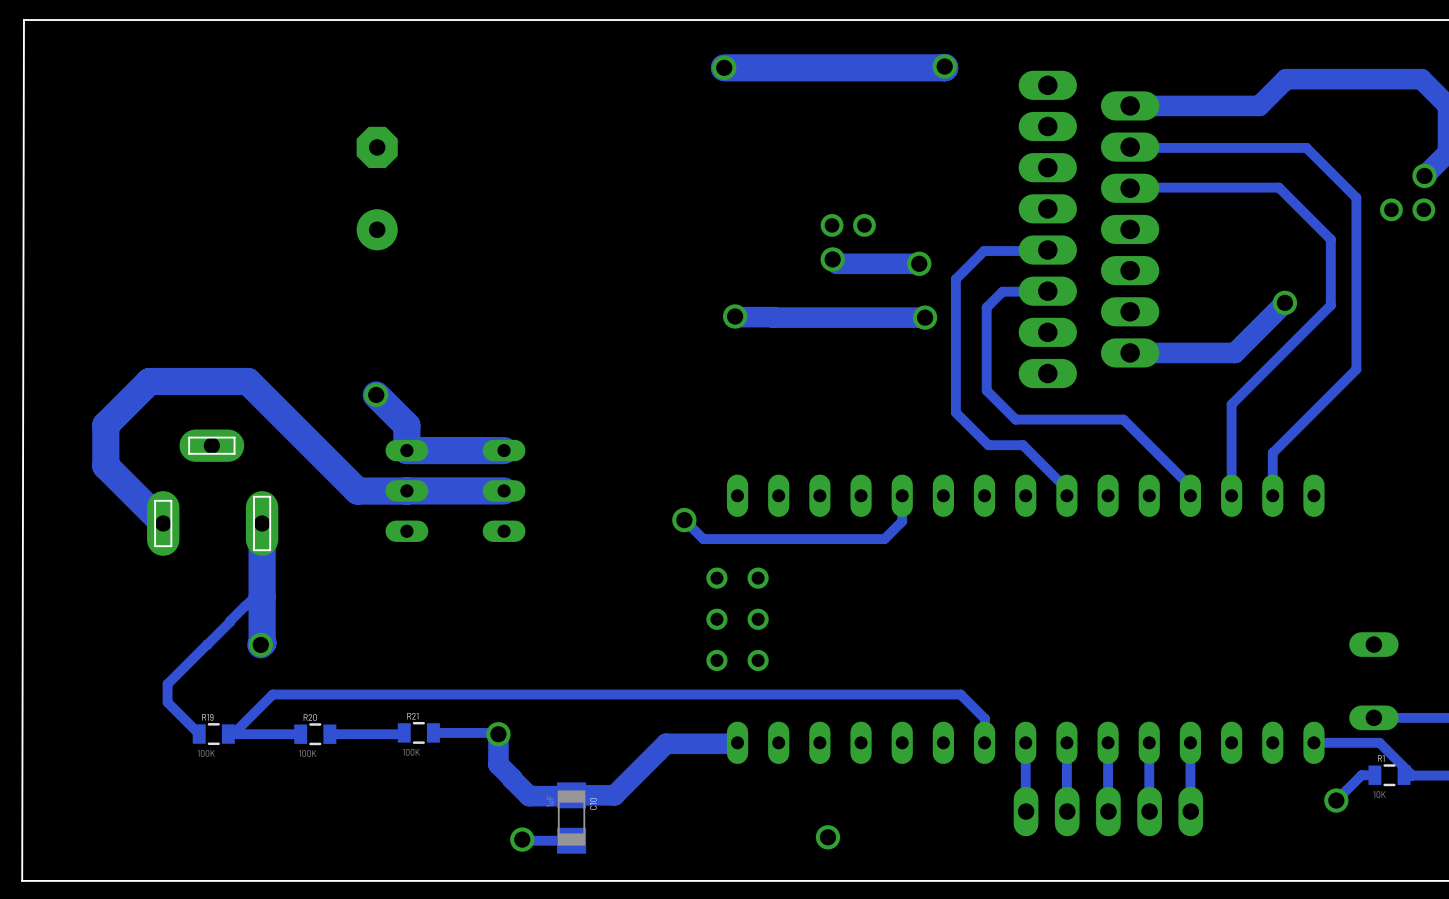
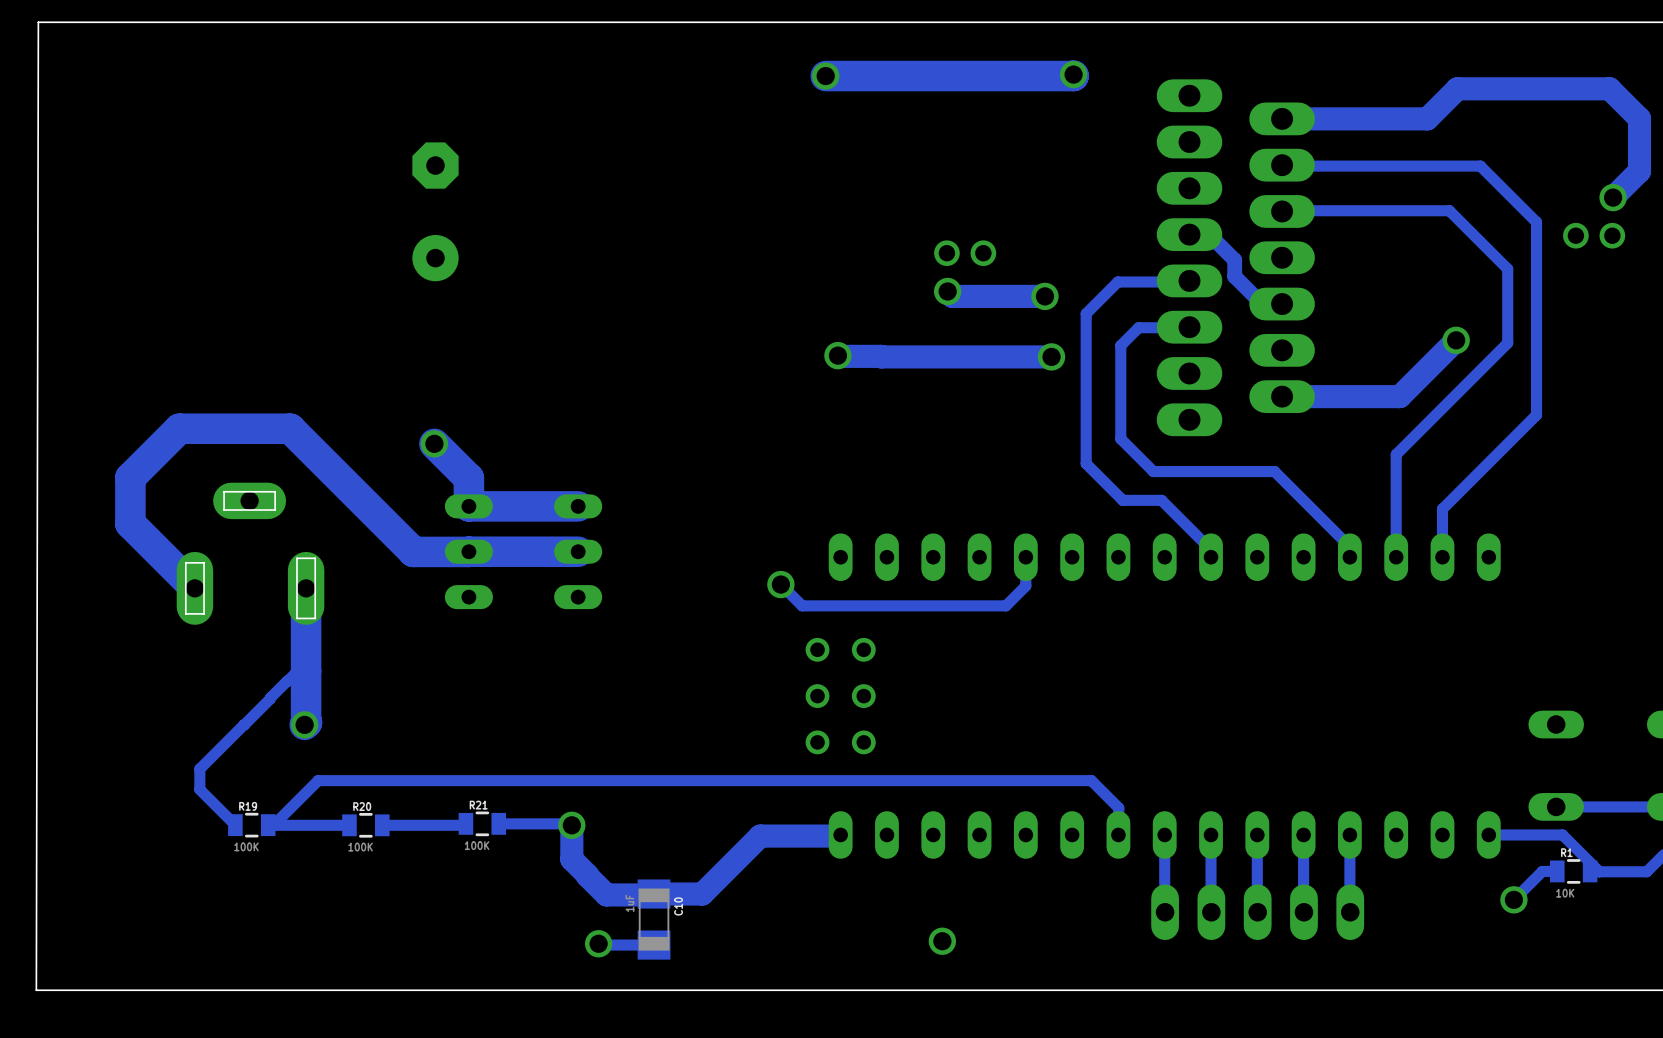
track: none -> (1189, 234) (1209, 234) (1234, 260) (1234, 276) (1257, 299) (1263, 304) (1282, 304)

